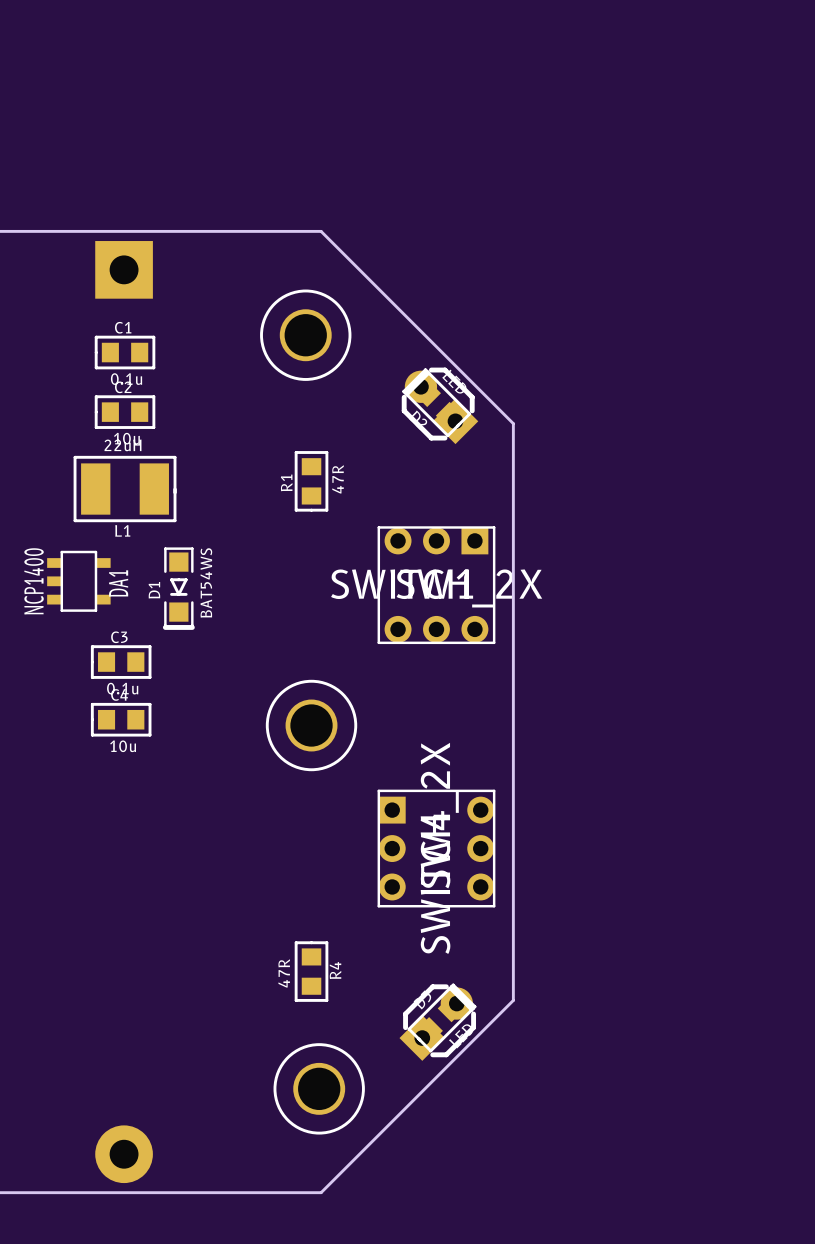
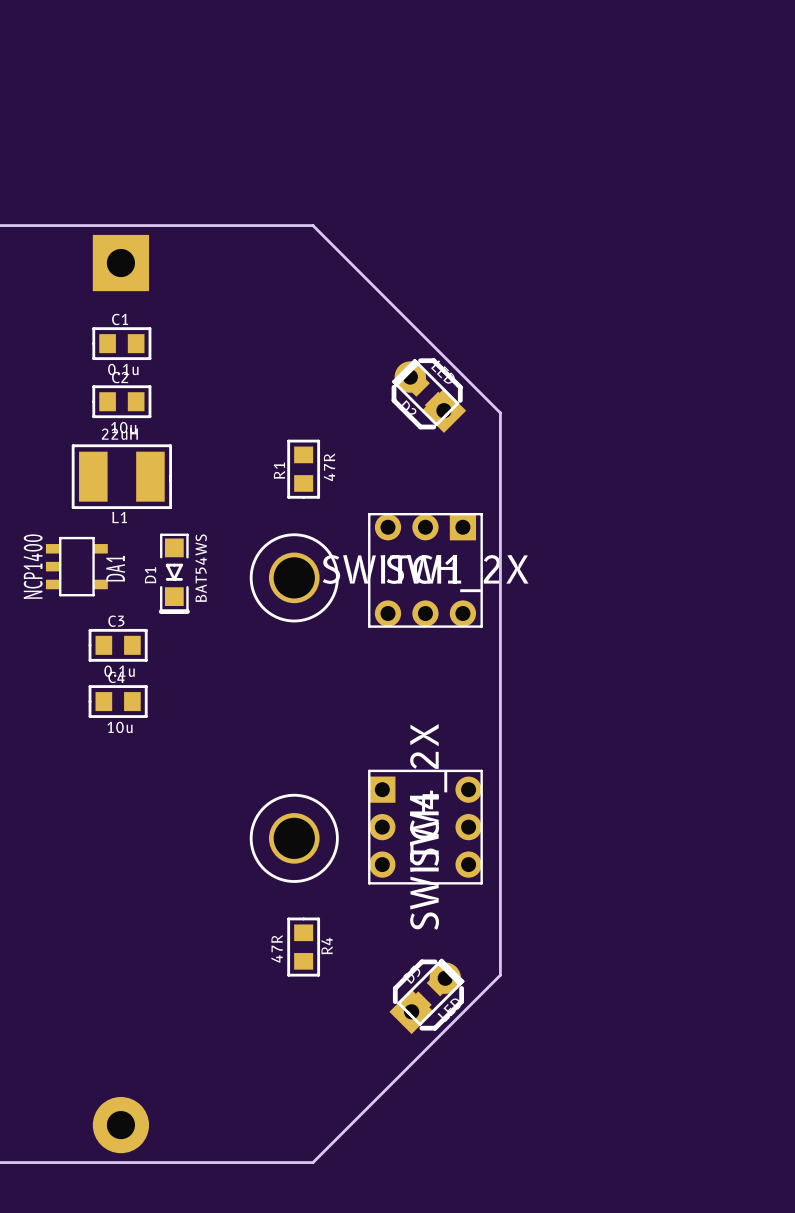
part: (305, 335) -> none
part: none -> (294, 577)
part: (311, 725) -> none
part: none -> (294, 838)
part: (319, 1088) -> none

